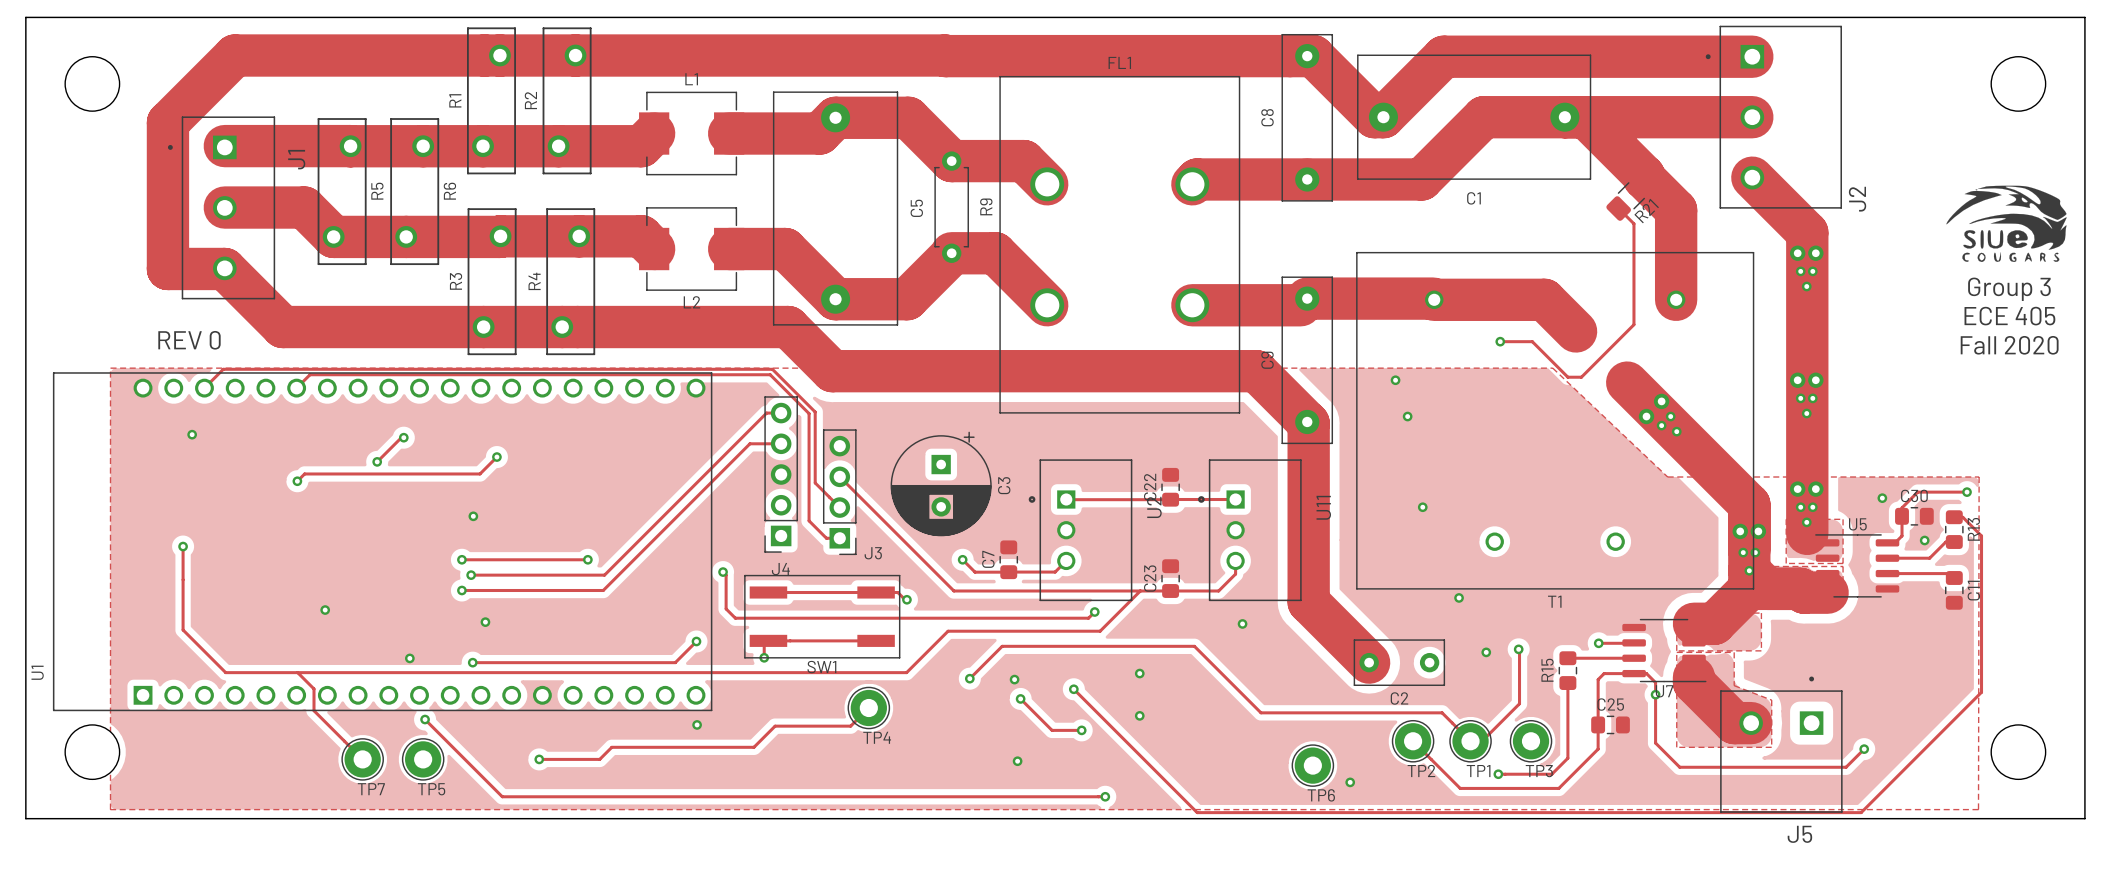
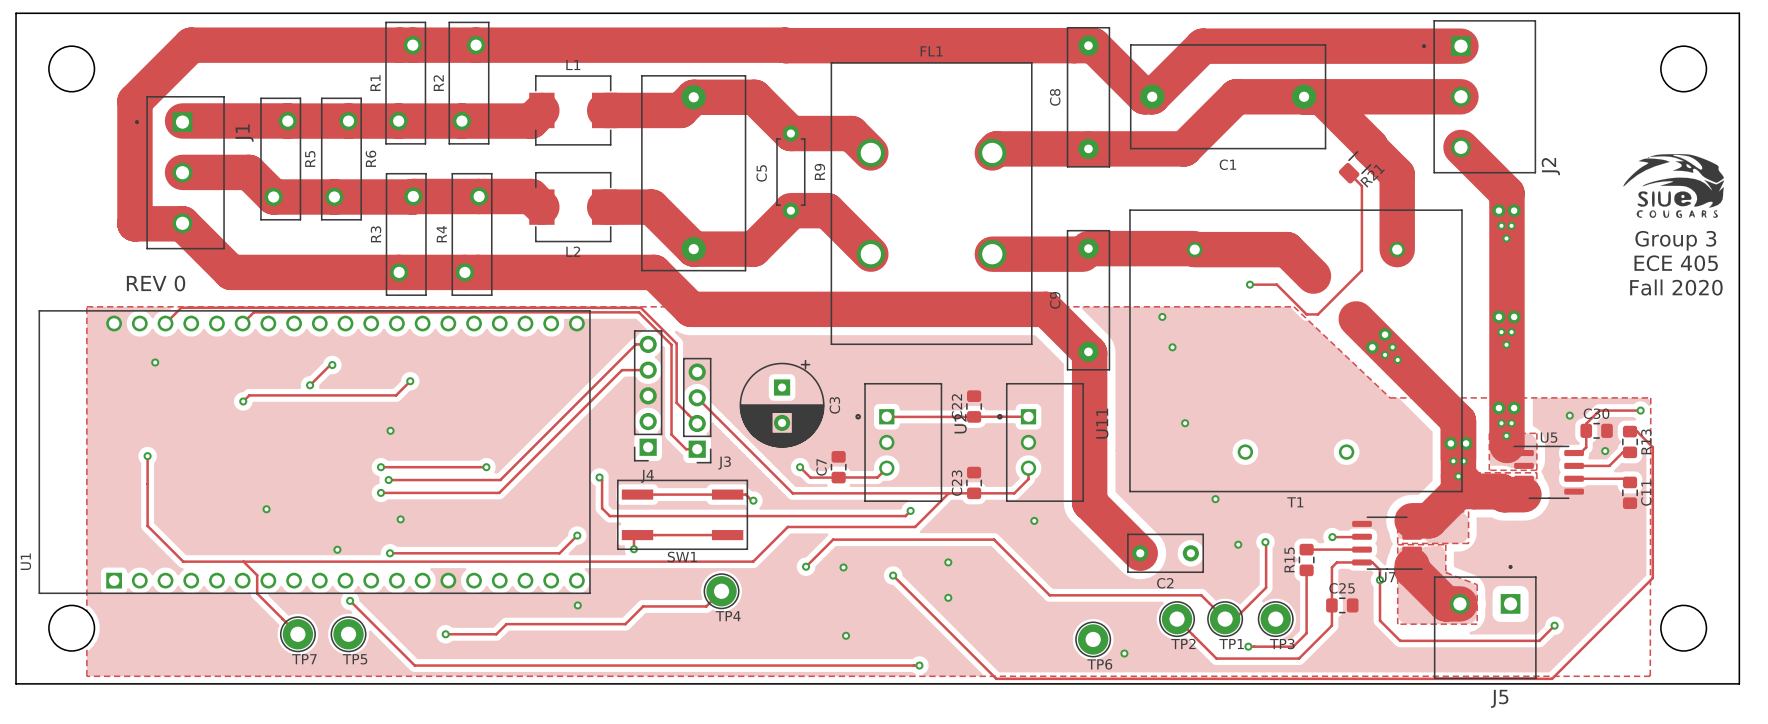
track: (1020, 698) (1052, 730) (1081, 730) -> none
via: (1020, 698) -> none
via: (1081, 730) -> none

